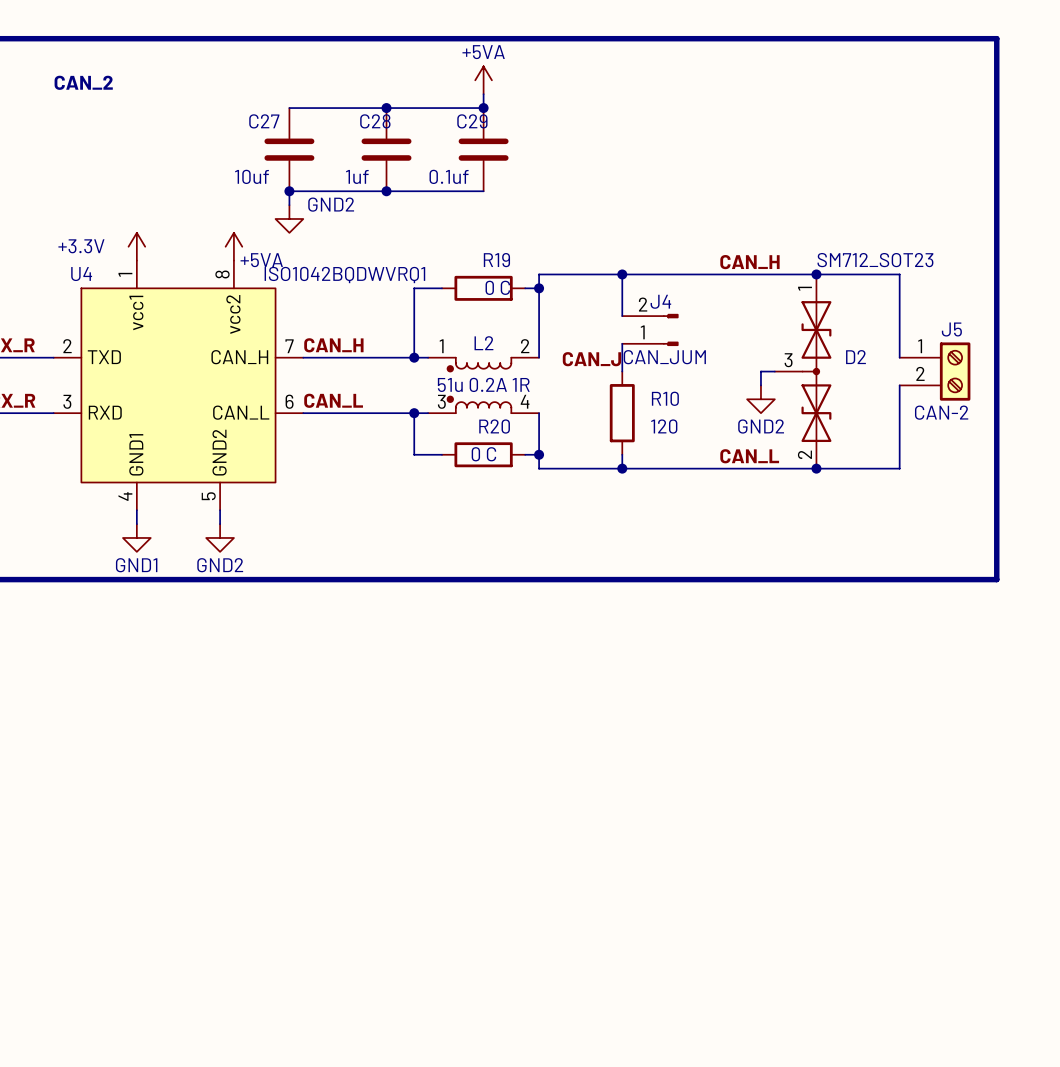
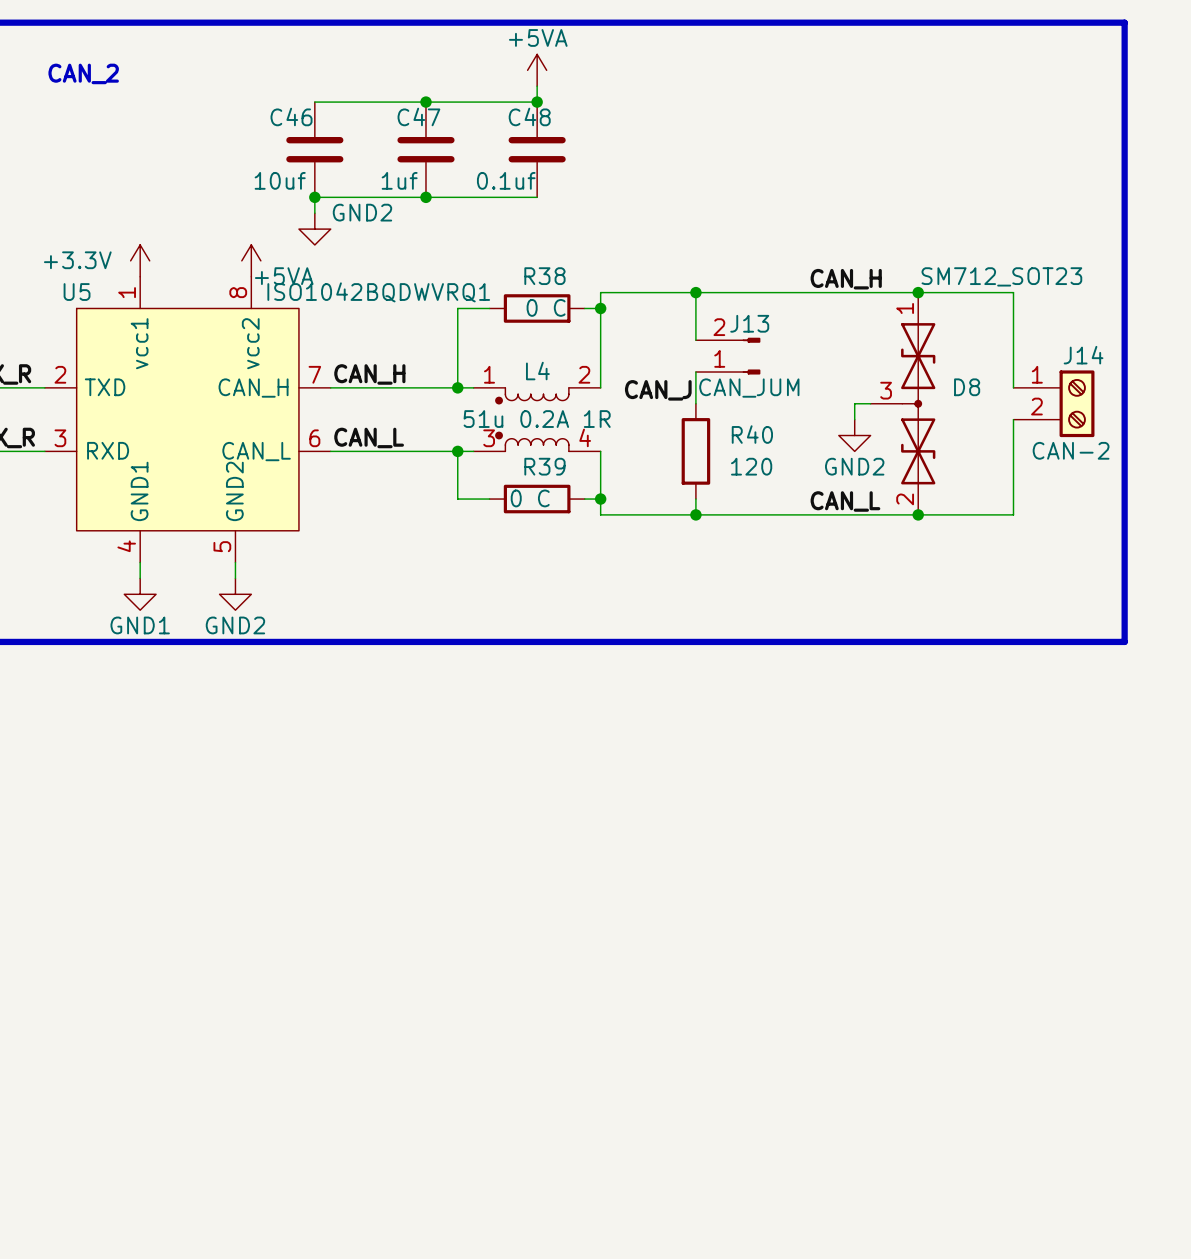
C27 name: C27 (264, 121) -> C46 (291, 116)
C28 name: C28 (375, 121) -> C47 (418, 116)
C29 name: C29 (472, 121) -> C48 (529, 116)
R19 name: R19 (496, 260) -> R38 (544, 276)
U4 name: U4 (81, 274) -> U5 (77, 292)
J4 name: J4 (660, 301) -> J13 (749, 323)
J5 name: J5 (951, 329) -> J14 (1083, 355)
L2 name: L2 (483, 343) -> L4 (537, 371)
D2 name: D2 (855, 357) -> D8 (967, 387)
R10 name: R10 (665, 398) -> R40 (752, 434)
R20 name: R20 (494, 426) -> R39 (544, 466)

